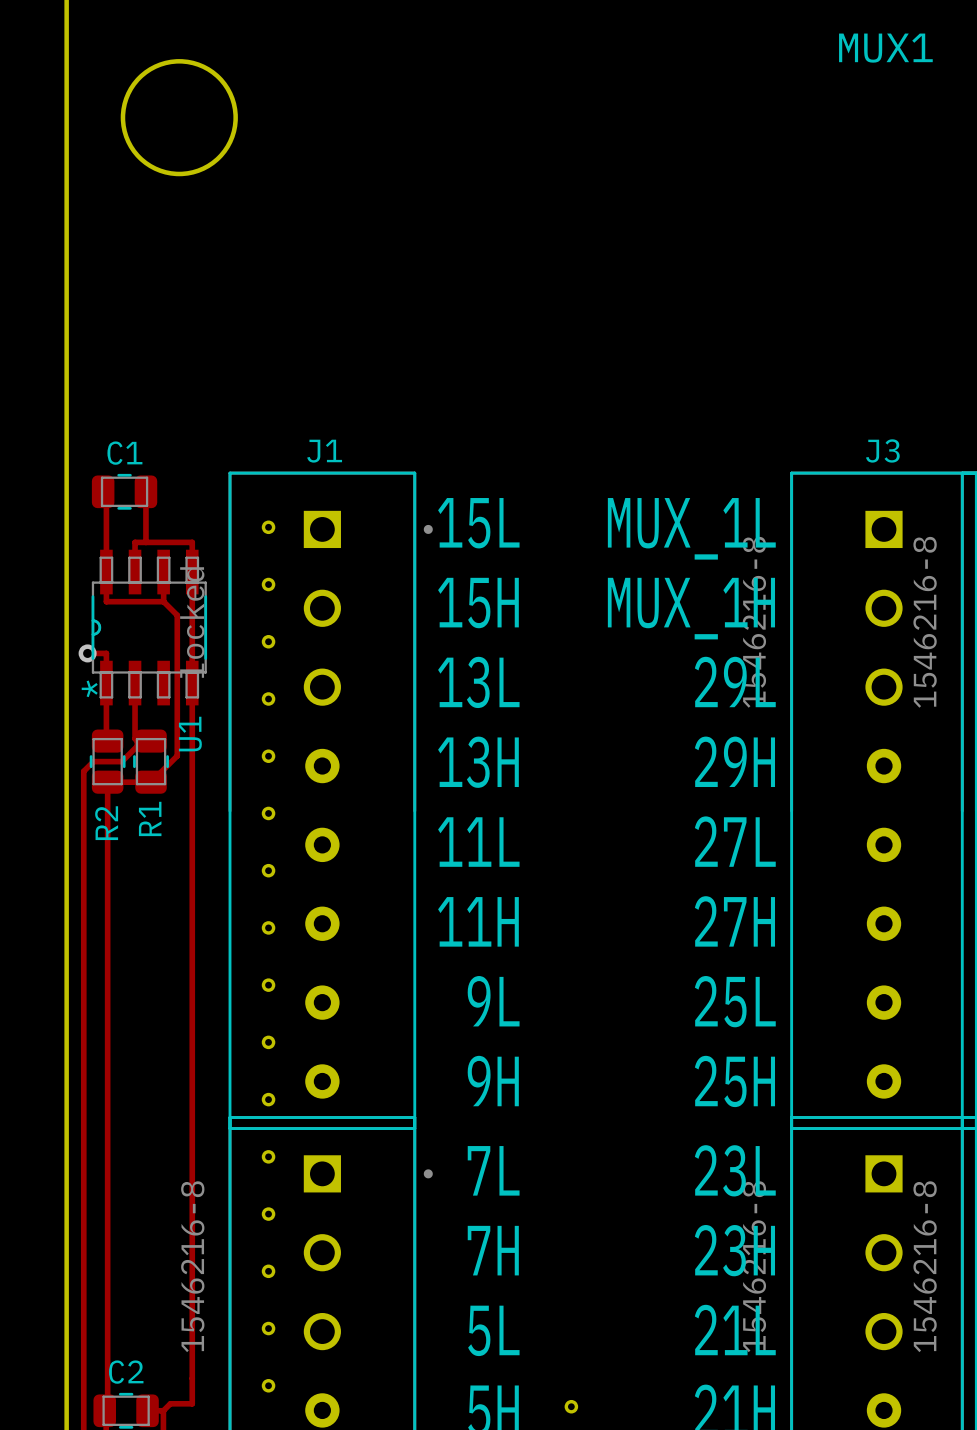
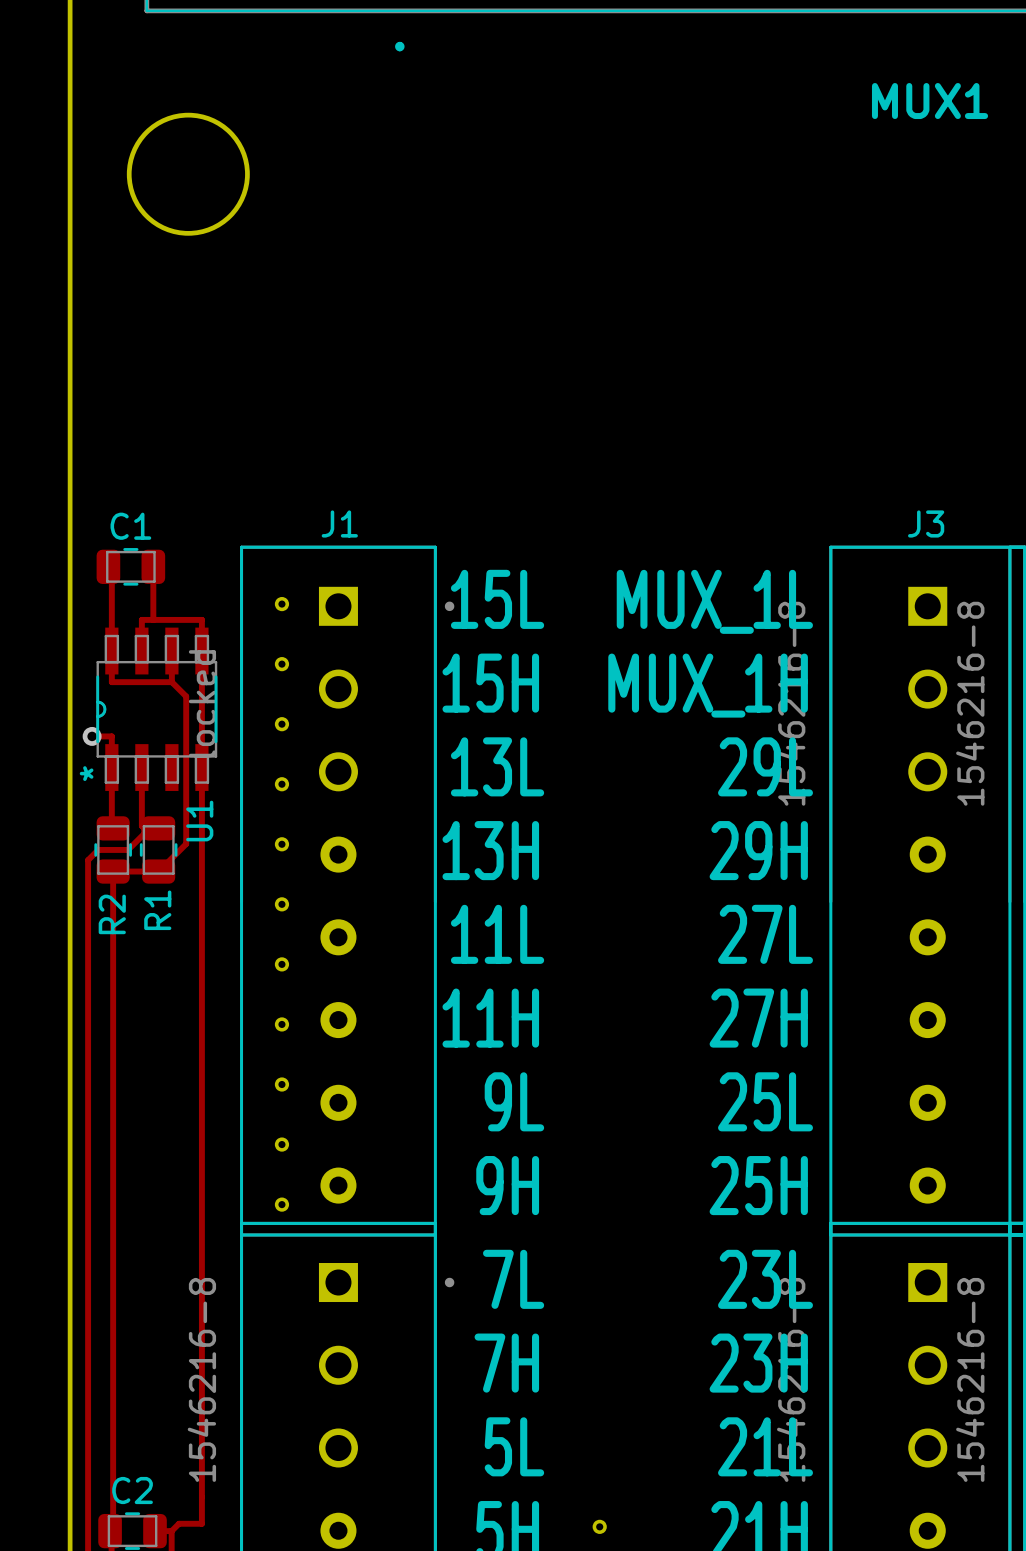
part: (268, 1156) -> none
part: (268, 1214) -> none
part: (268, 1271) -> none
part: (268, 1328) -> none
part: (268, 1385) -> none

